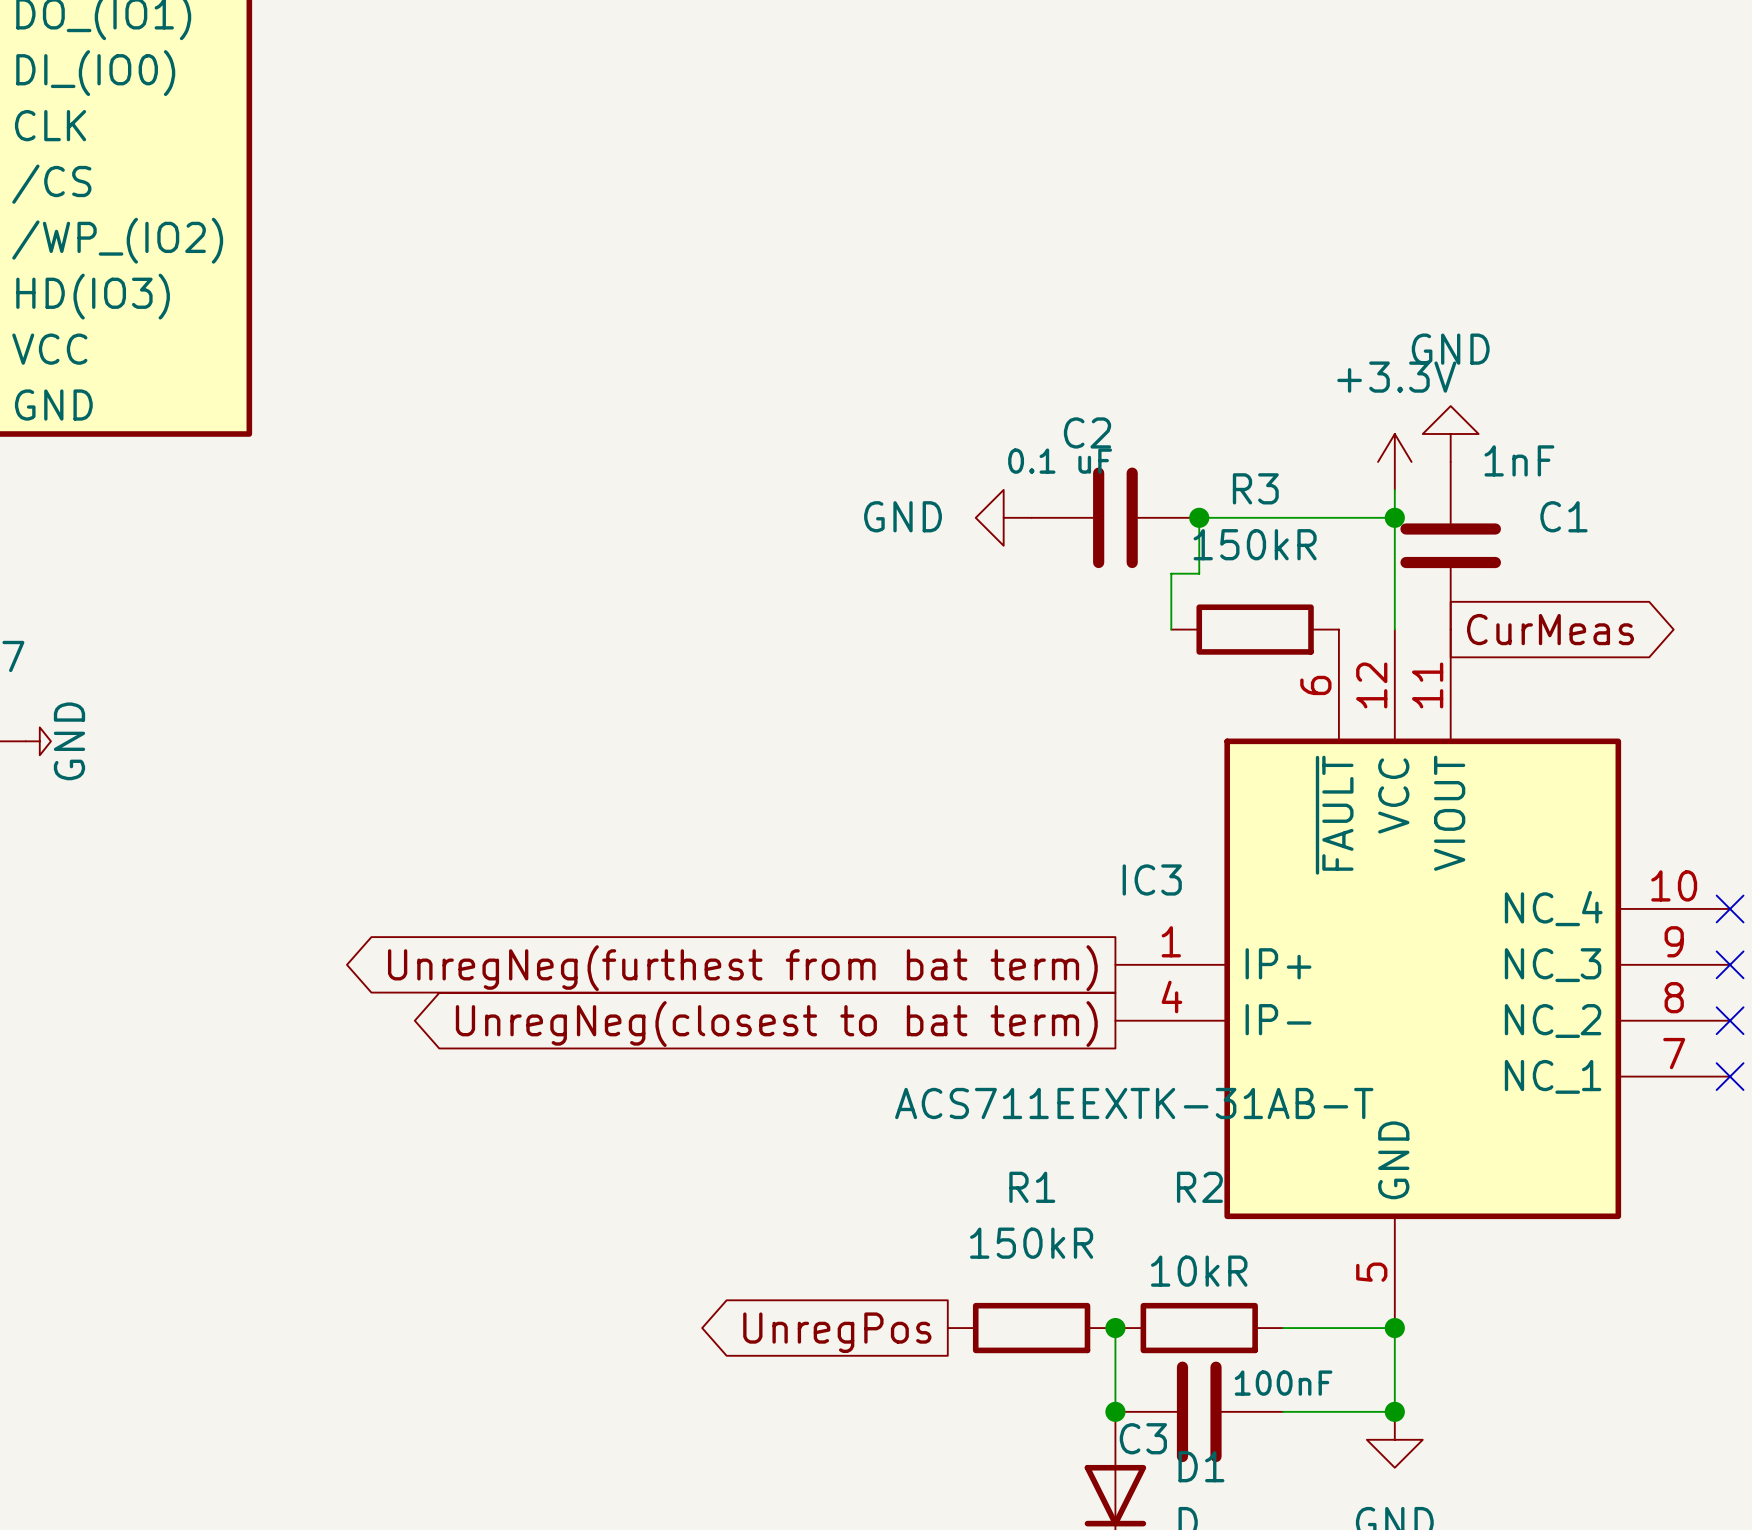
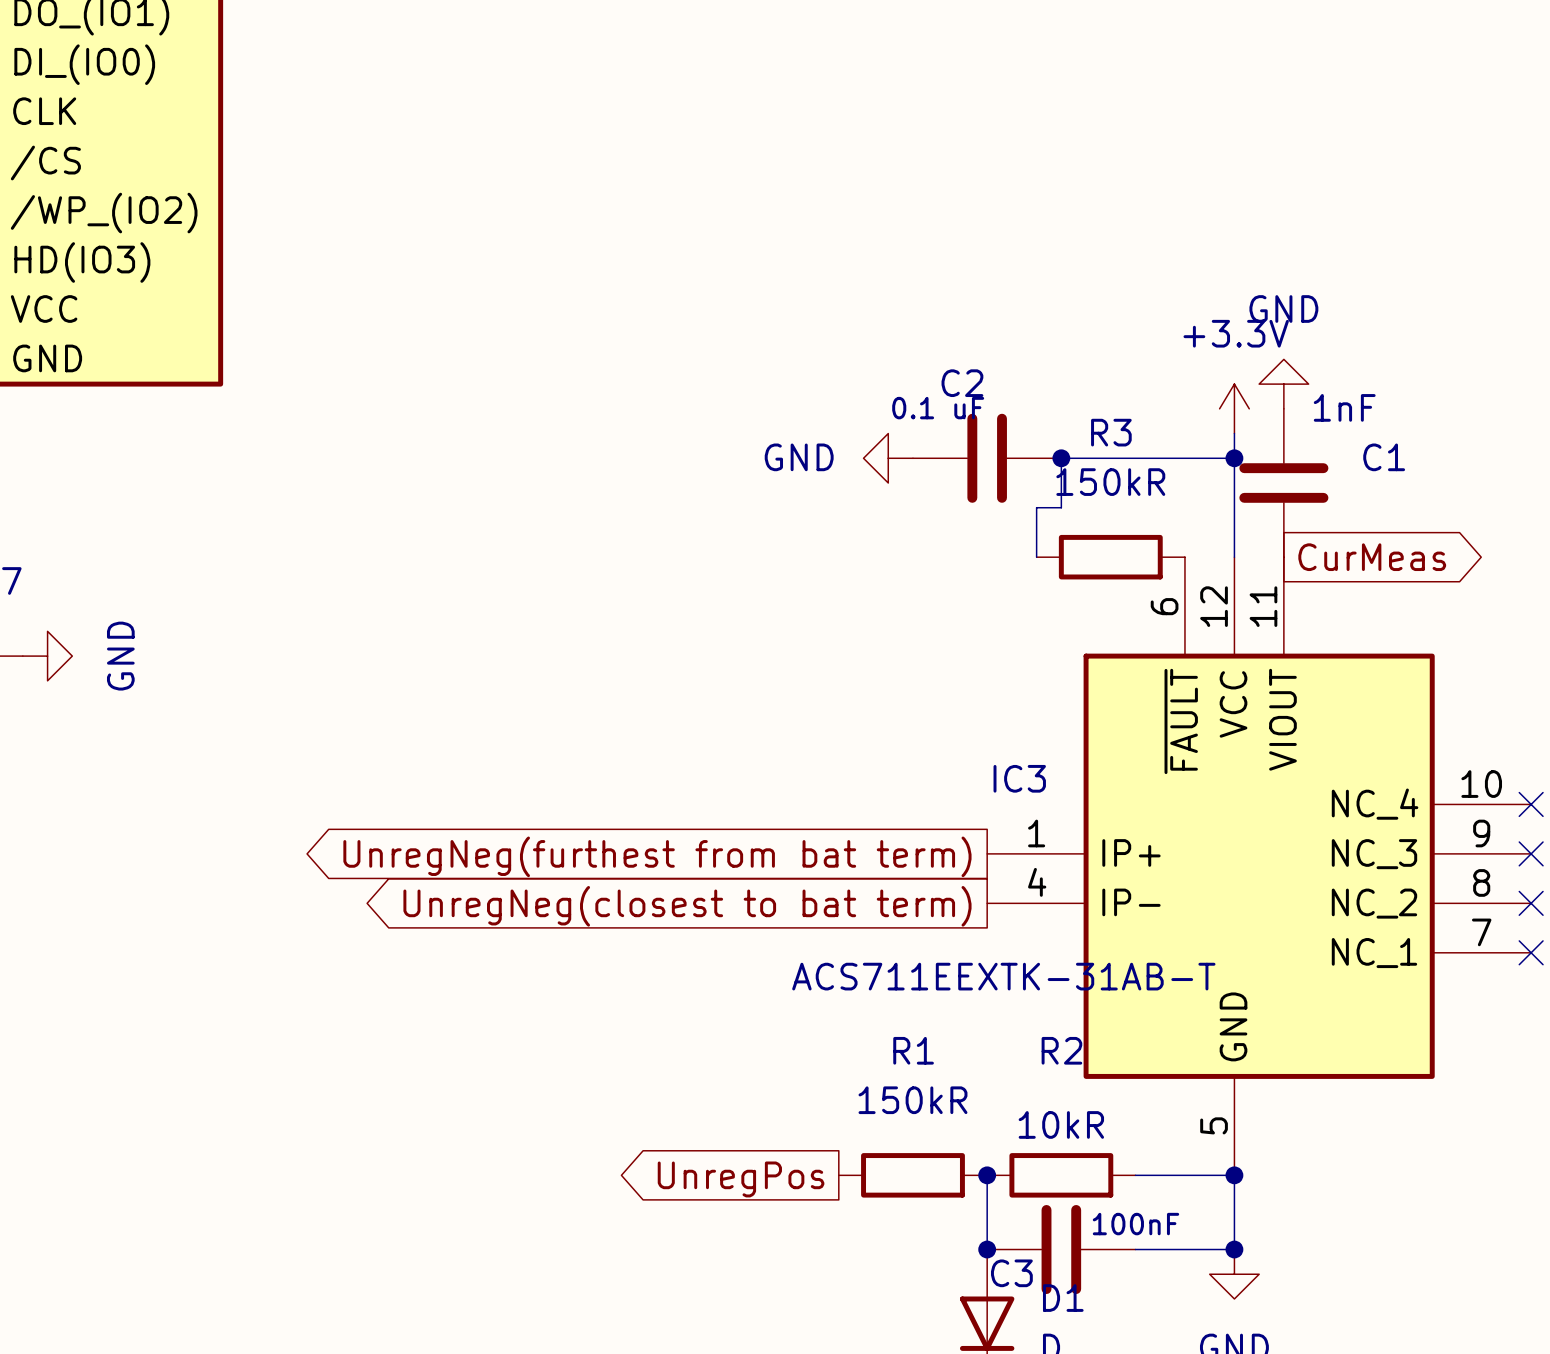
power symbol shape: [25, 727, 51, 756] -> [22, 631, 73, 681]
power symbol text position: GND (69, 741) -> GND (120, 656)

